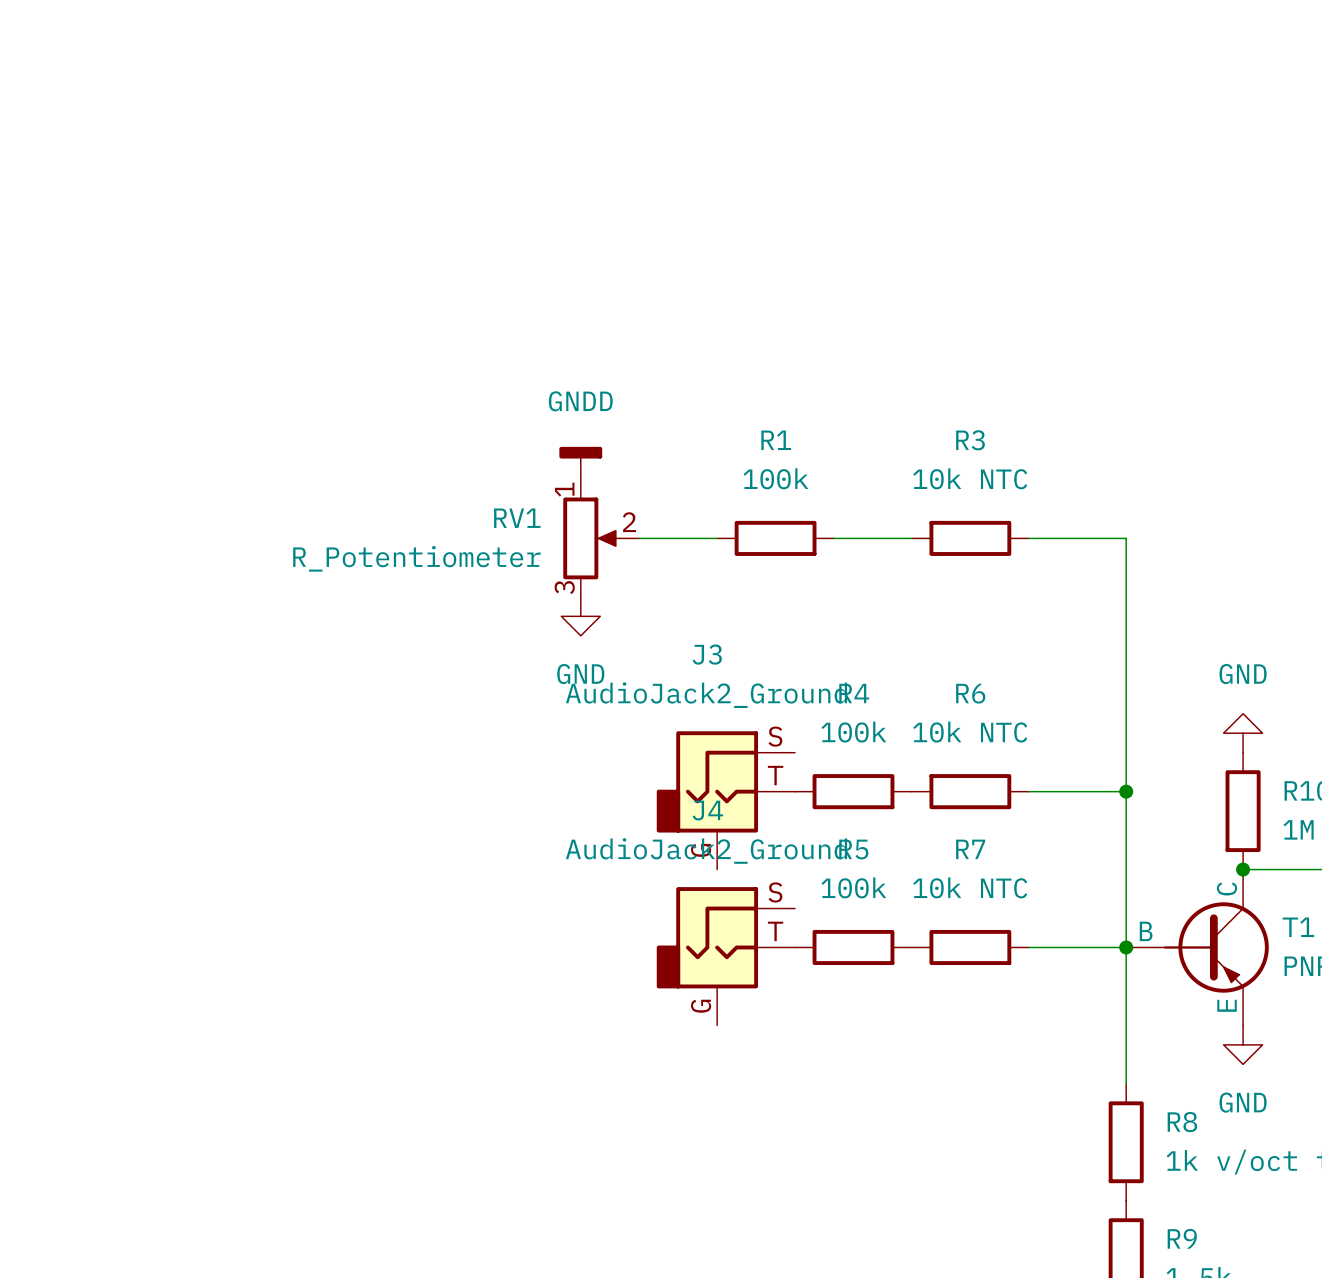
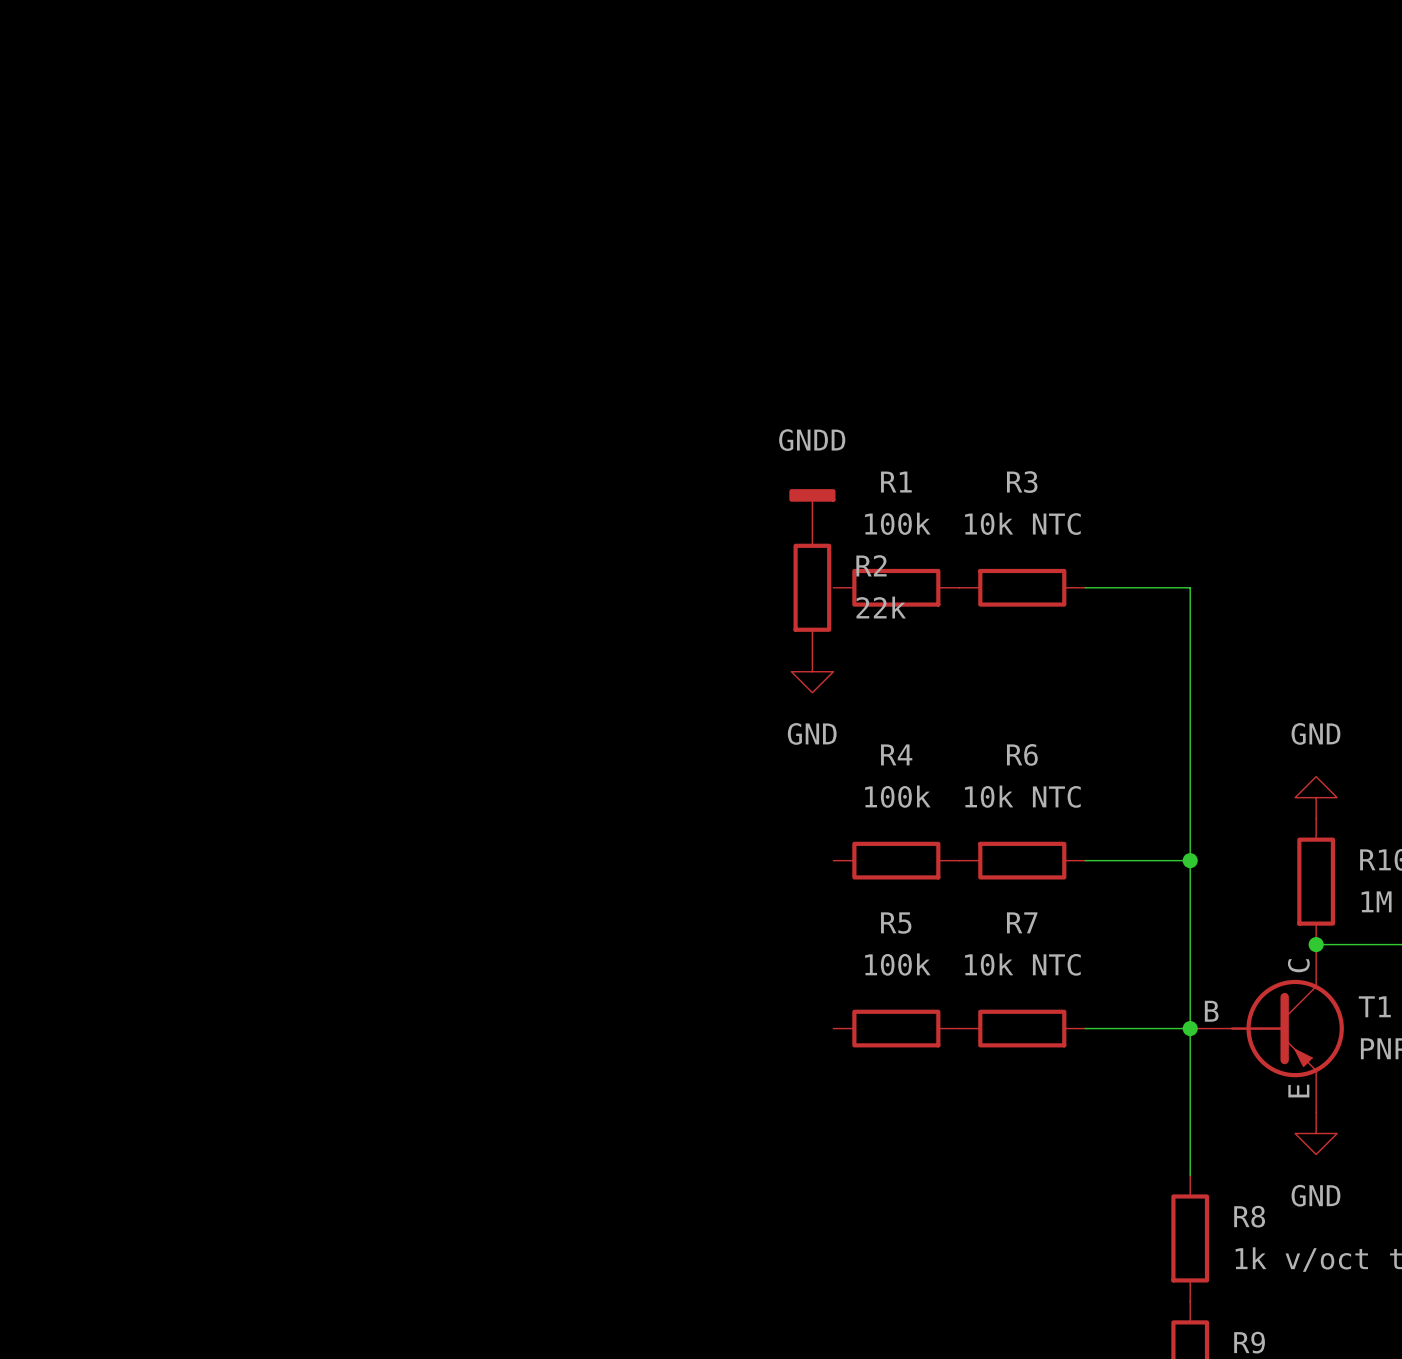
power symbol position: GNDD (580, 463) -> GNDD (812, 506)
RV1: R_Potentiometer (601, 538) -> none
wire: (639, 538) (717, 538) -> none
R1 position: (775, 538) -> (896, 587)
R2: none -> 22k (812, 587)
wire: (834, 538) (911, 538) -> none
power symbol position: GND (580, 616) -> GND (812, 671)
J3: AudioJack2_Ground (725, 800) -> none
J4: AudioJack2_Ground (725, 956) -> none

